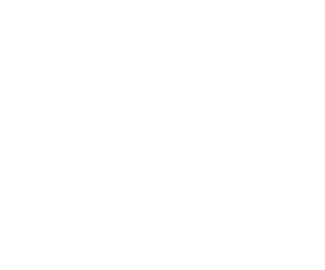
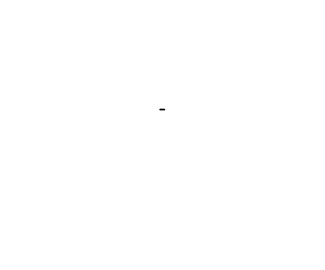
board edge: none -> (160, 109) (164, 109)

